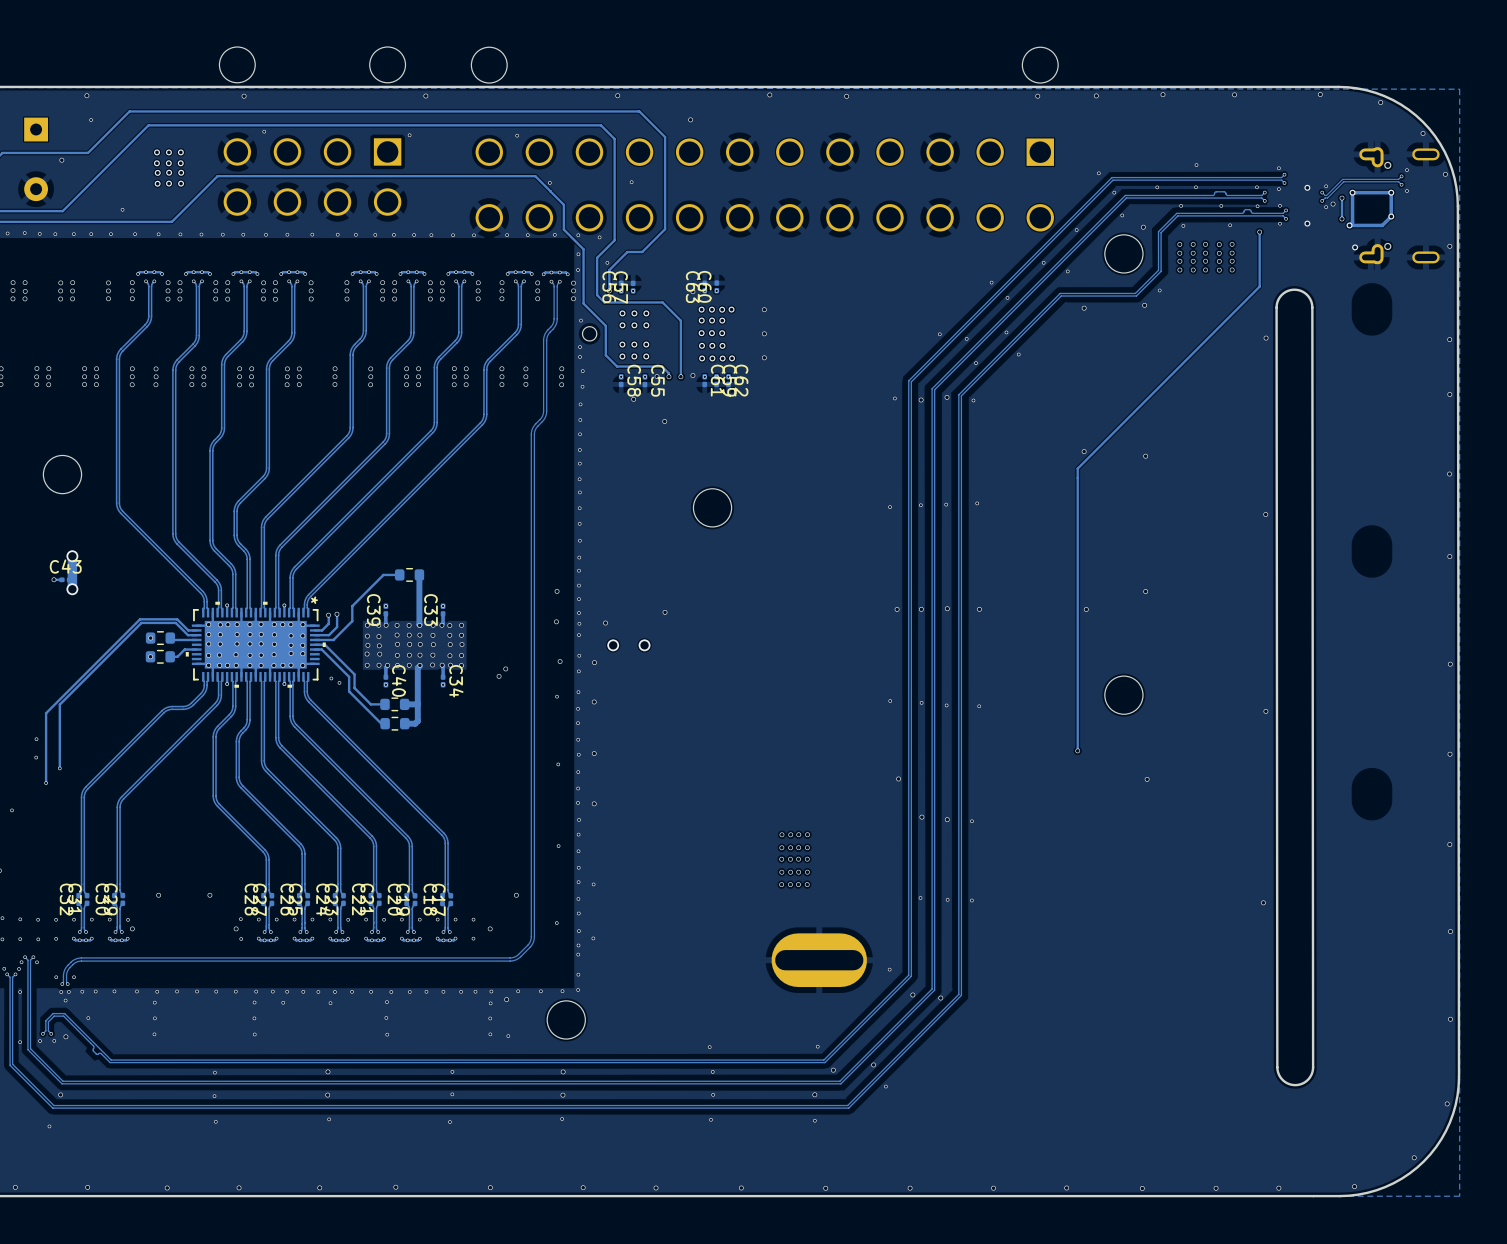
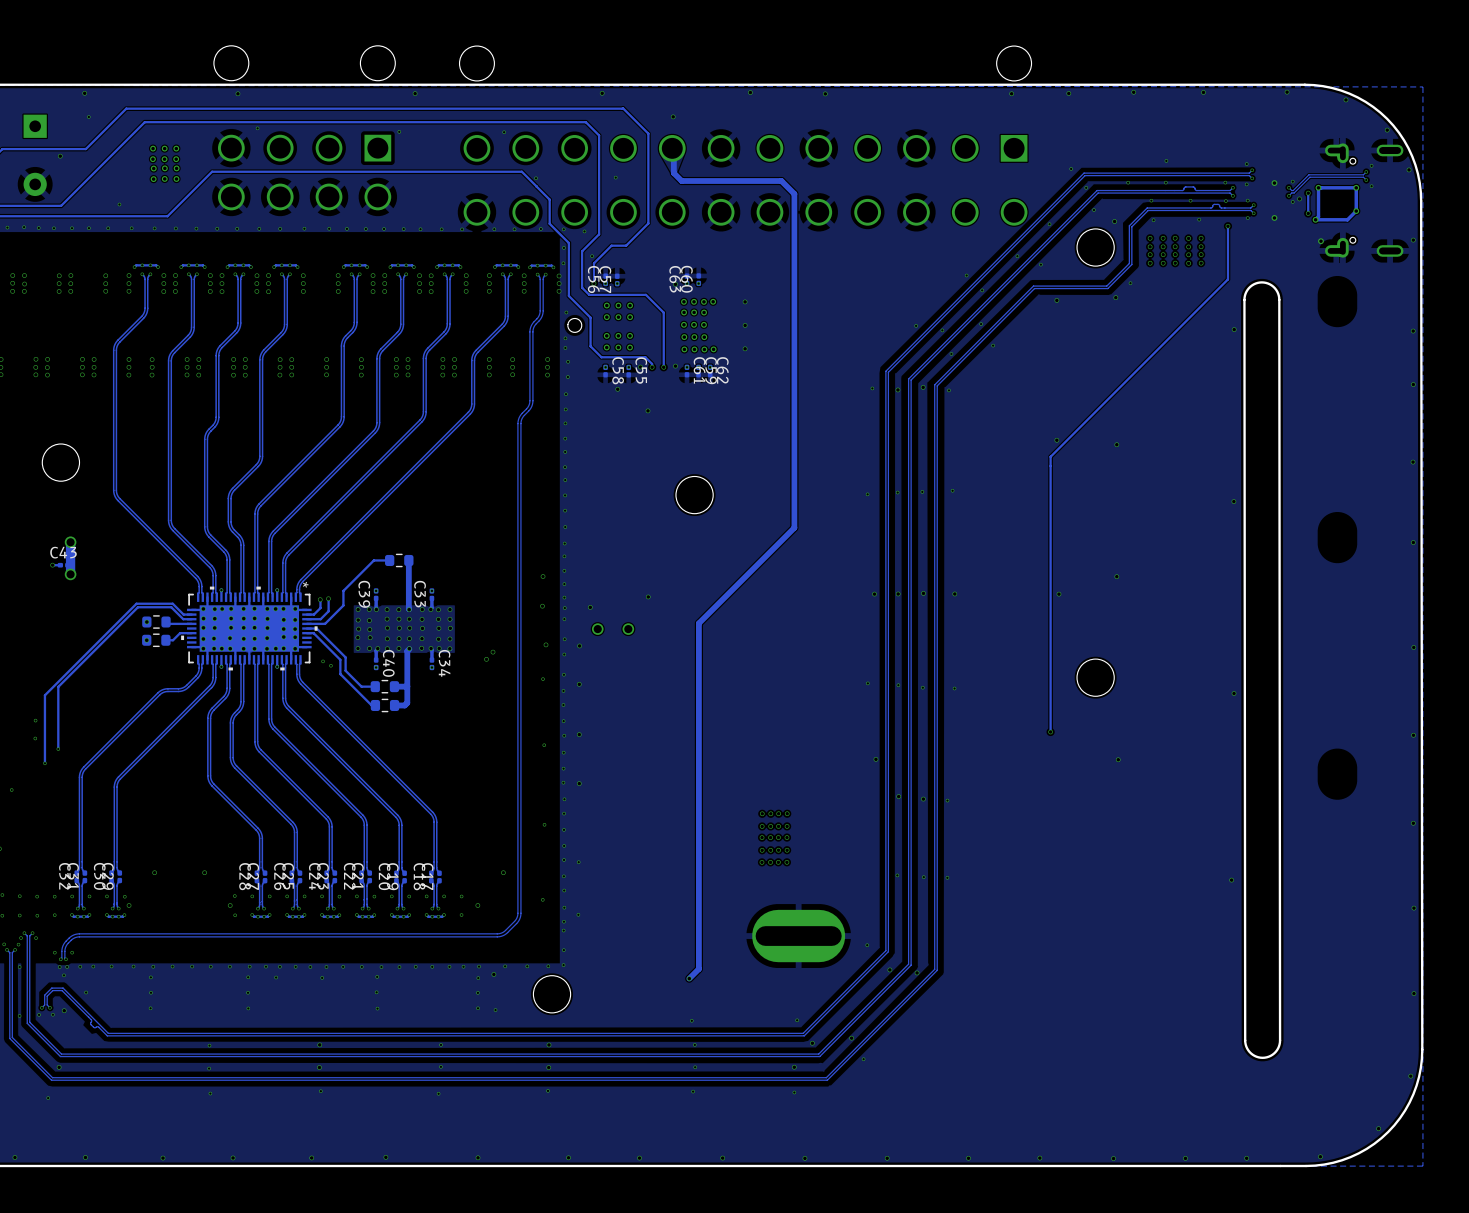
track: none -> (672, 148) (673, 173) (681, 181) (781, 181) (794, 193) (794, 527) (698, 623) (698, 969) (689, 978)
via: none -> (689, 978)

